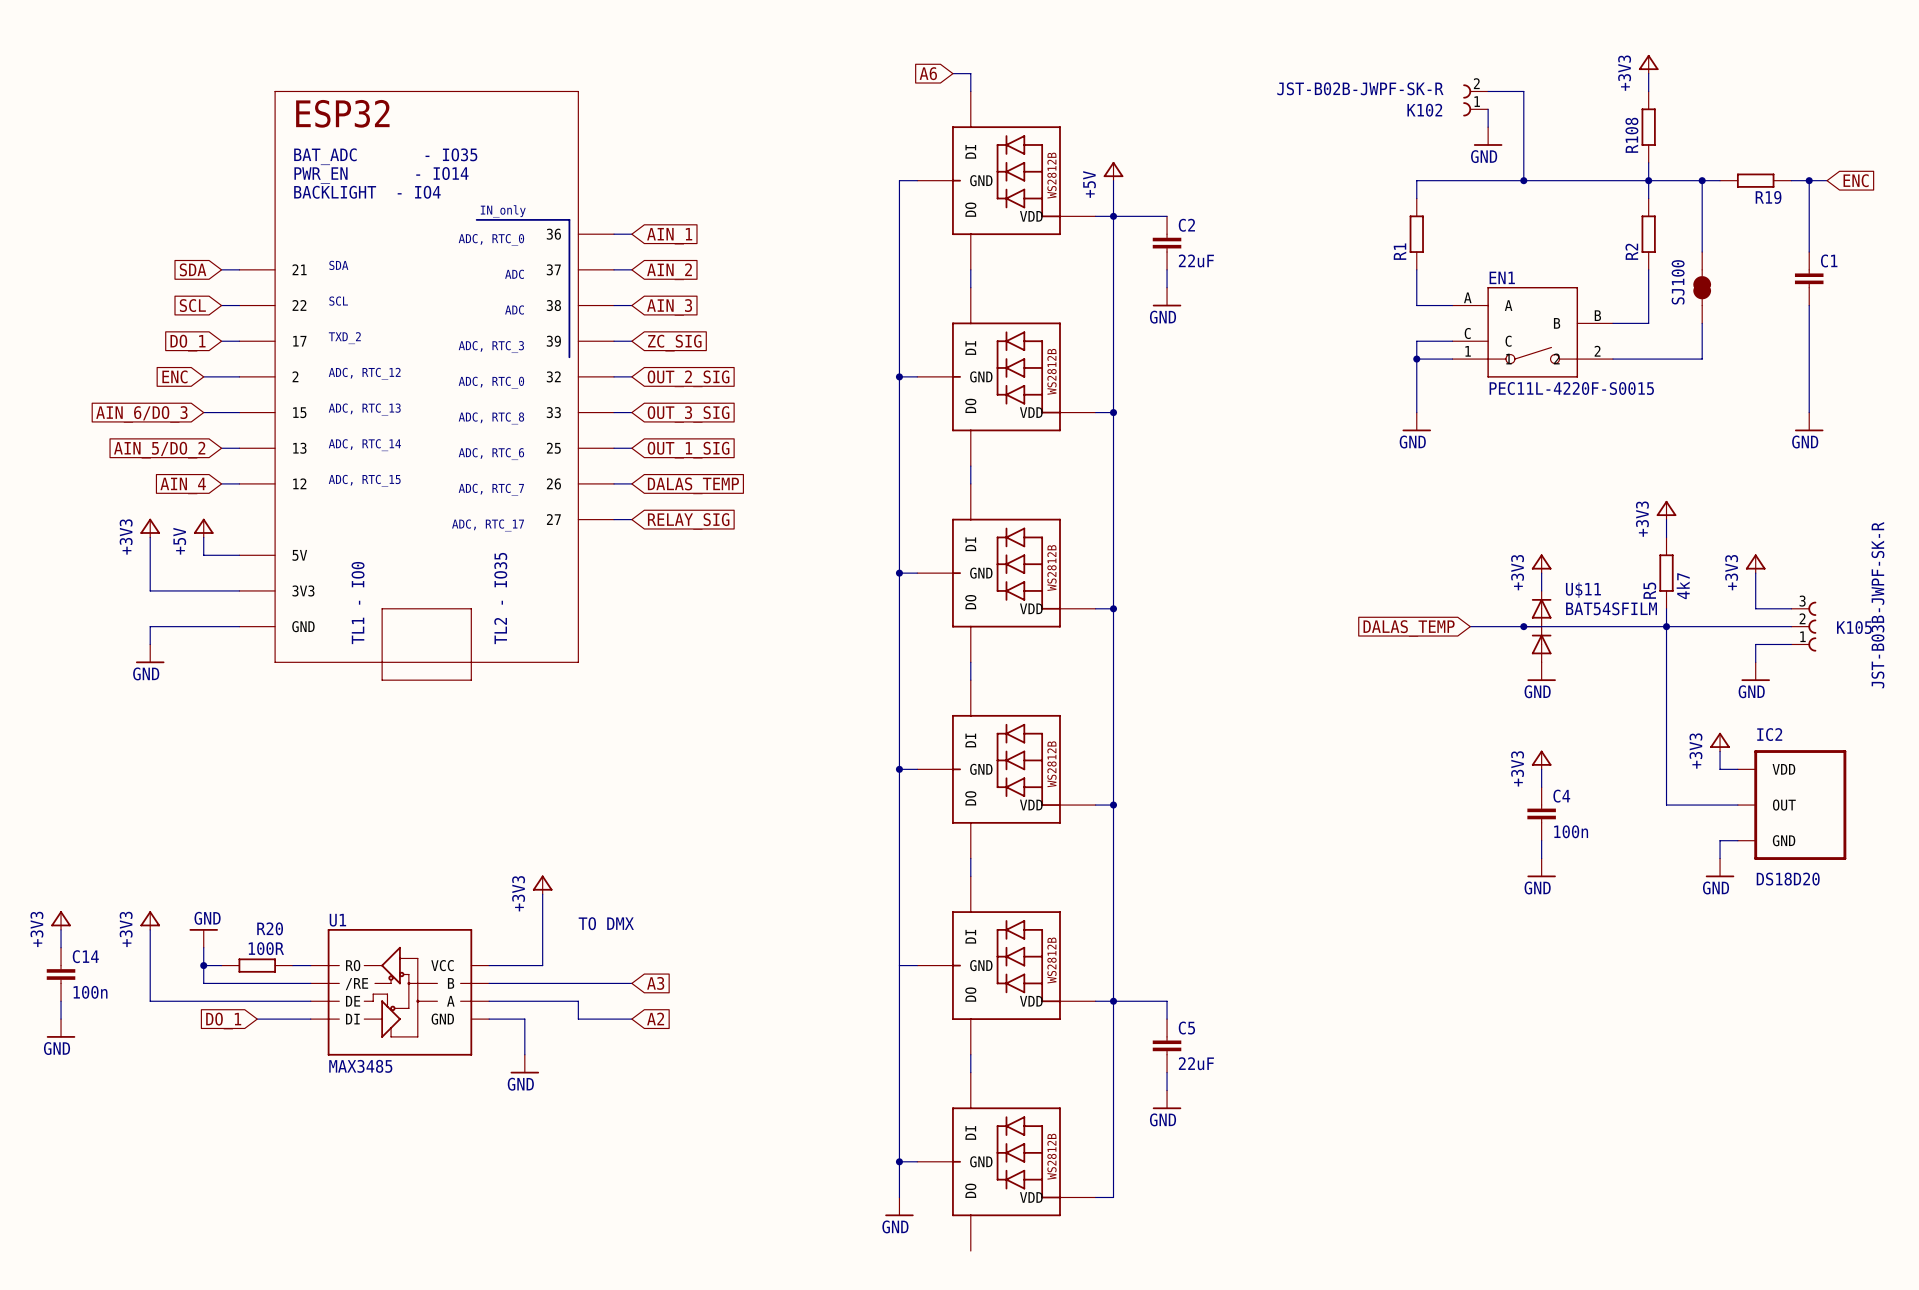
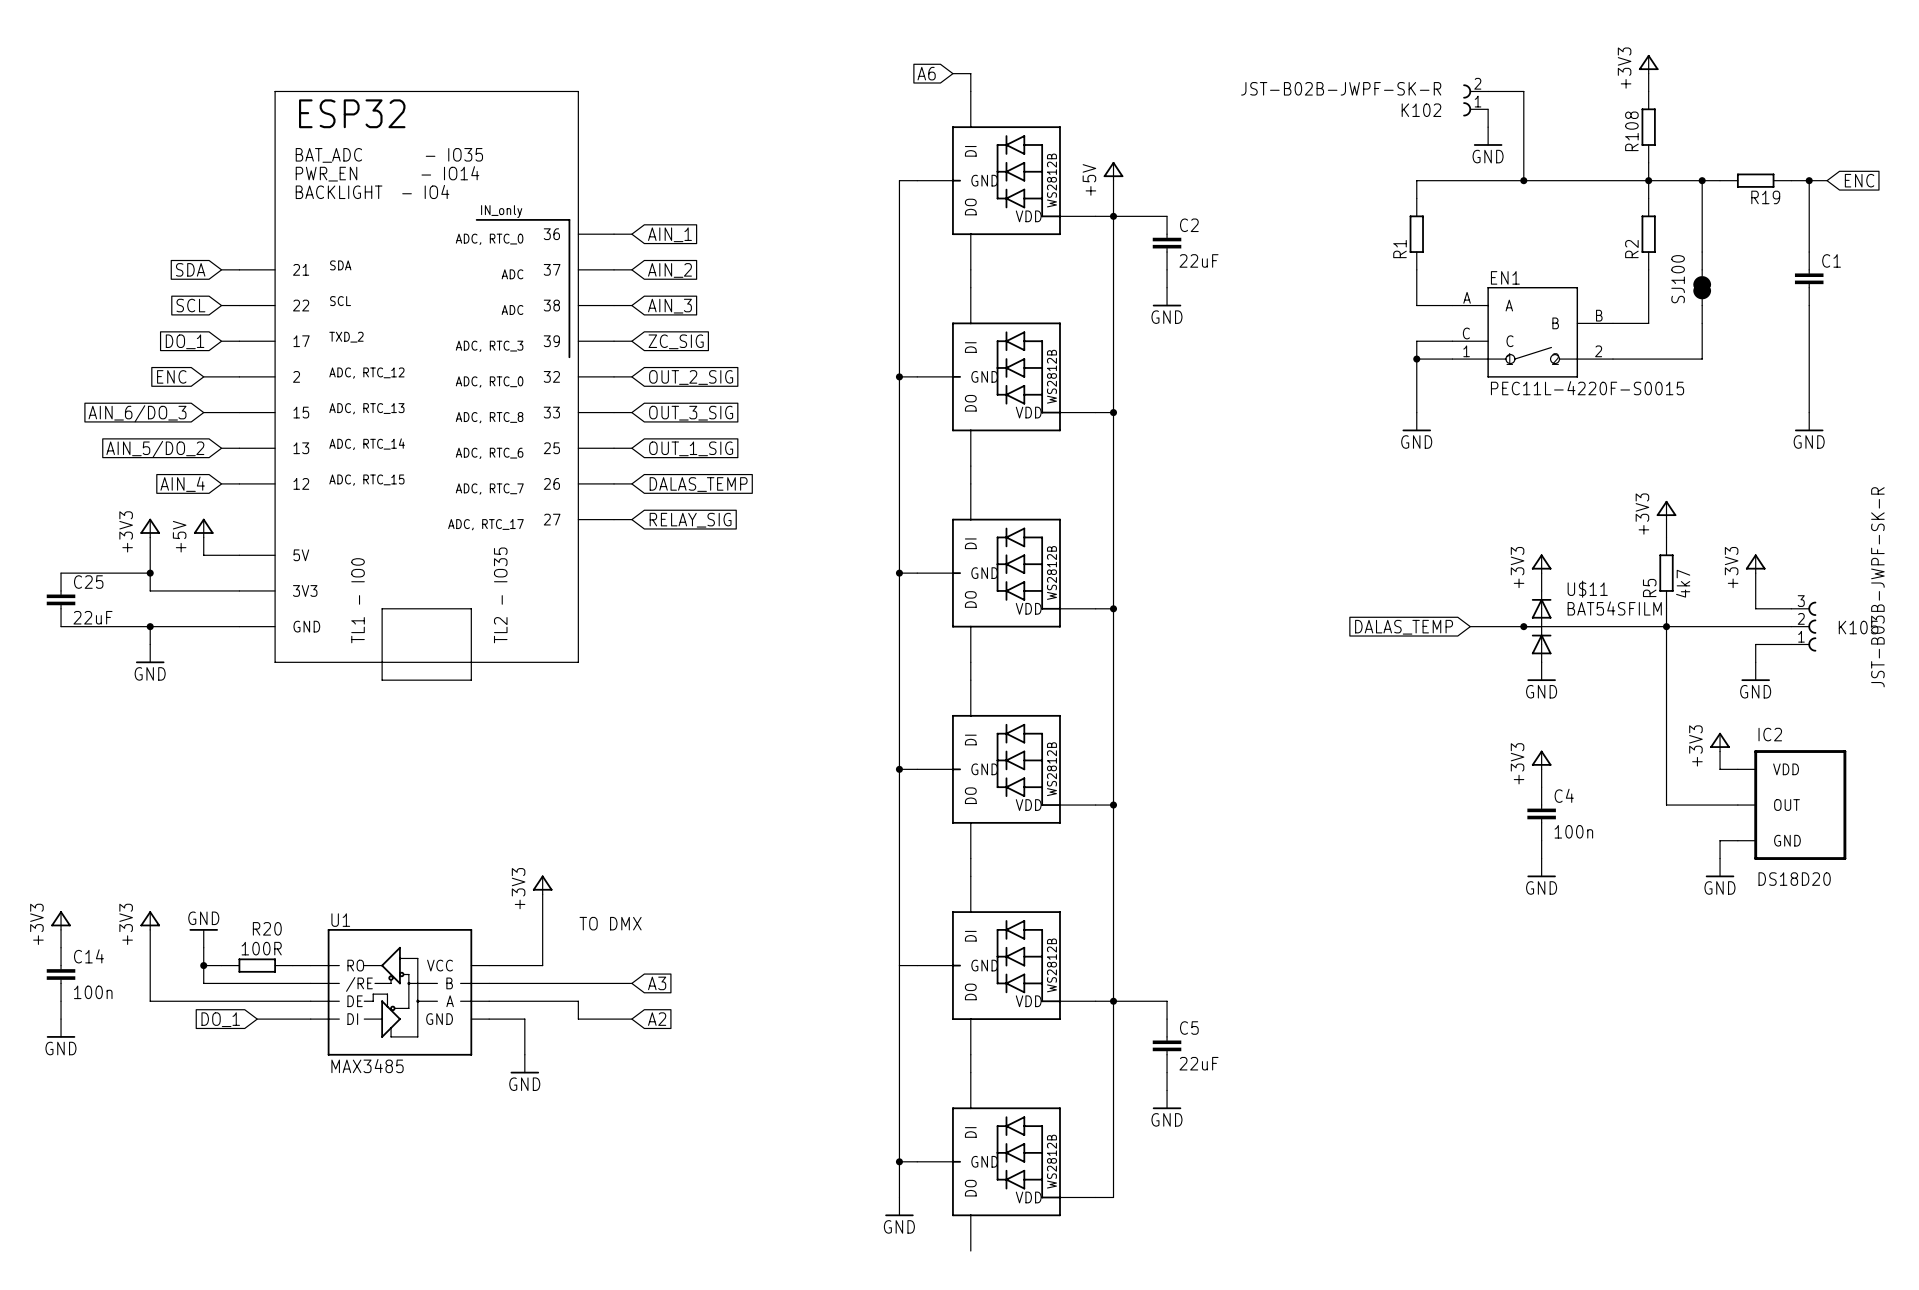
wire: none -> (61, 573) (150, 573)
junction: none -> (150, 573)
C25: none -> 22uF (61, 599)
wire: none -> (61, 626) (150, 626)
junction: none -> (150, 626)

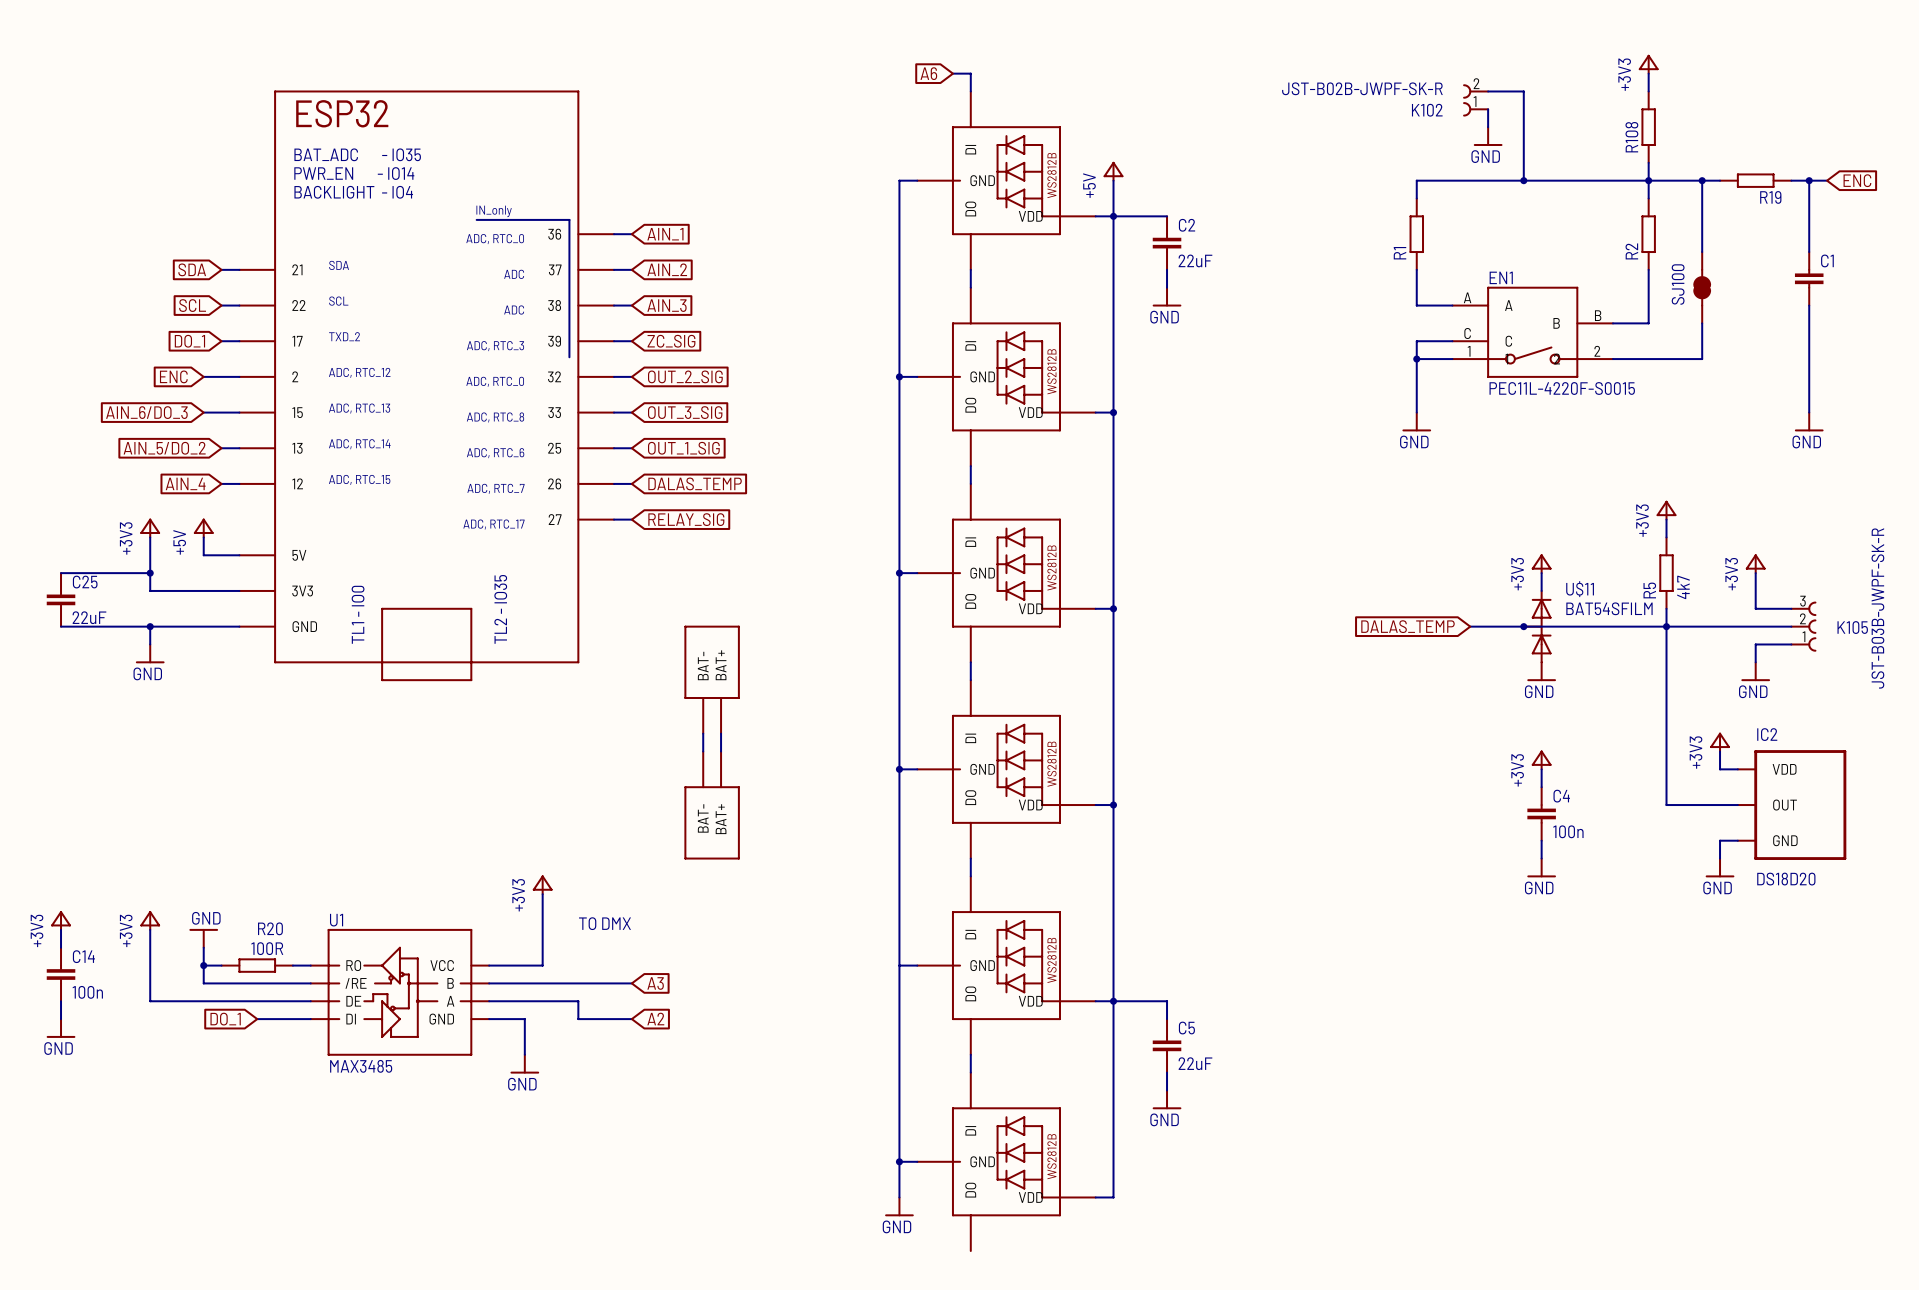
part: none -> (712, 679)
wire: none -> (703, 733) (703, 751)
wire: none -> (721, 733) (721, 751)
part: none -> (712, 805)

